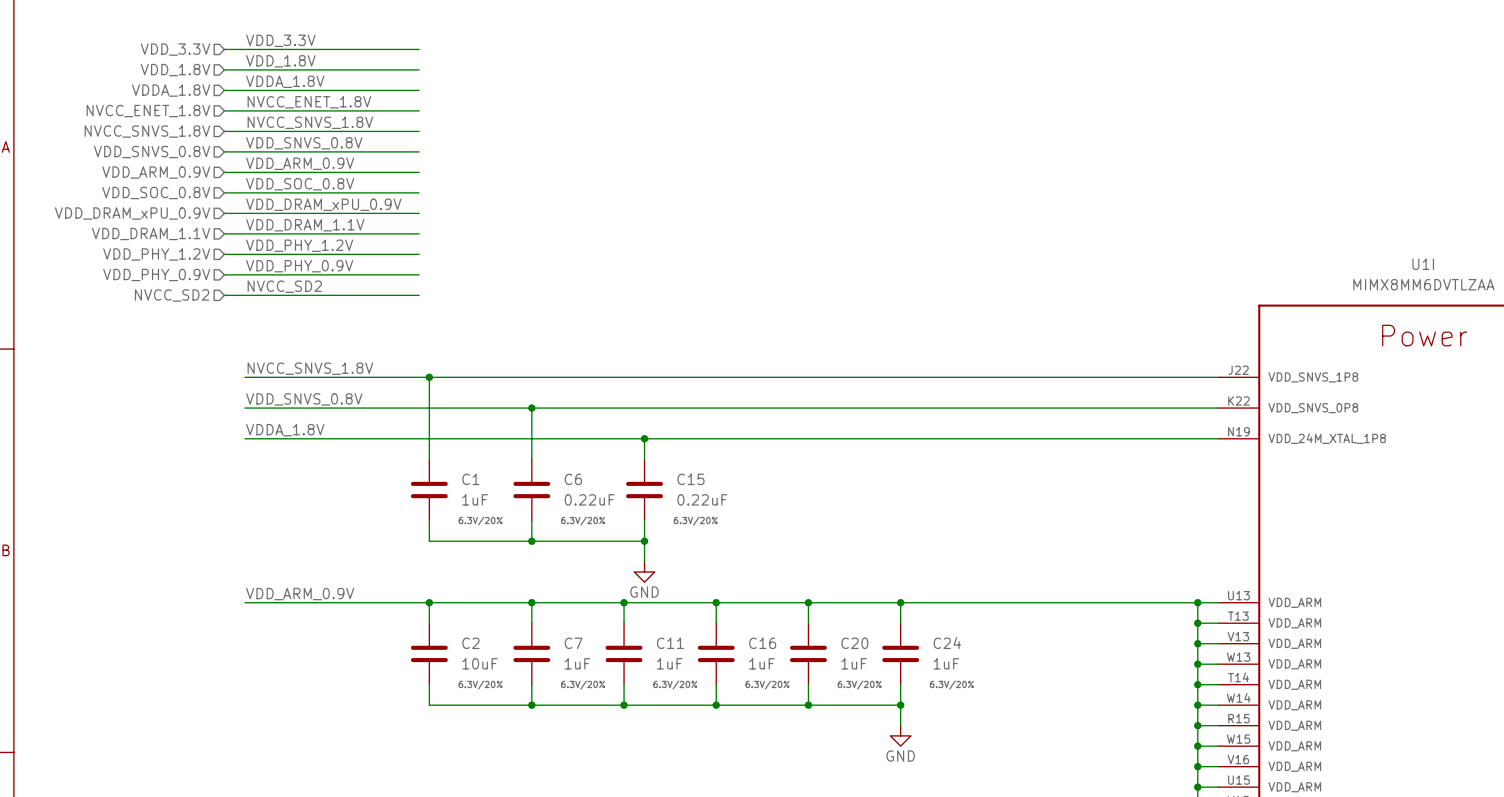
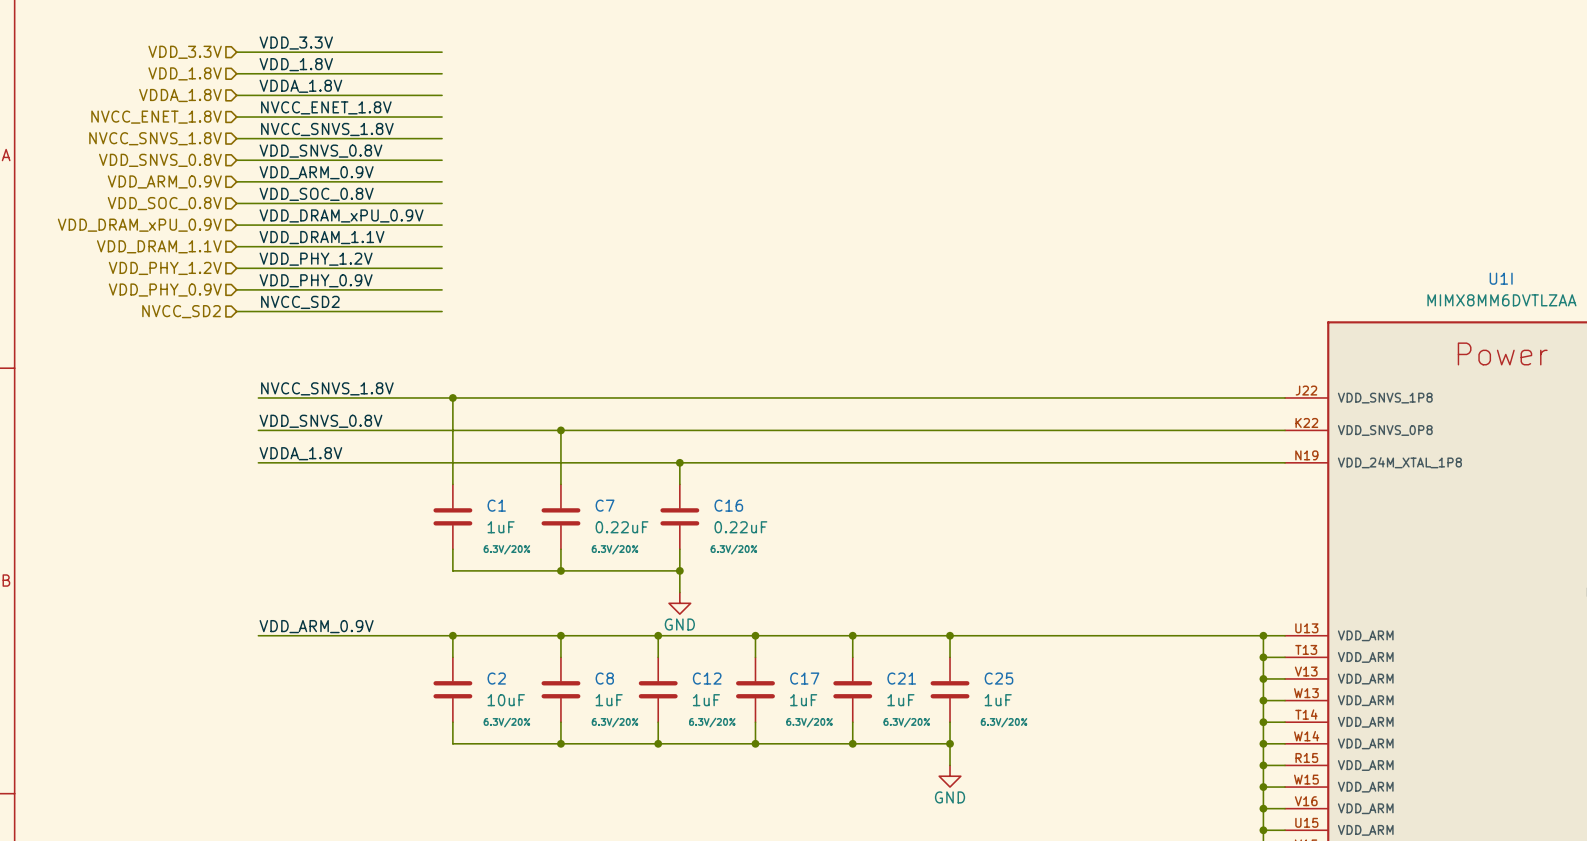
C6 name: C6 (573, 479) -> C7 (605, 505)
C15 name: C15 (690, 479) -> C16 (728, 505)
C7 name: C7 (573, 643) -> C8 (604, 678)
C11 name: C11 (670, 643) -> C12 (707, 678)
C16 name: C16 (762, 643) -> C17 (804, 678)
C20 name: C20 (854, 643) -> C21 (901, 678)
C24 name: C24 (947, 643) -> C25 (998, 678)

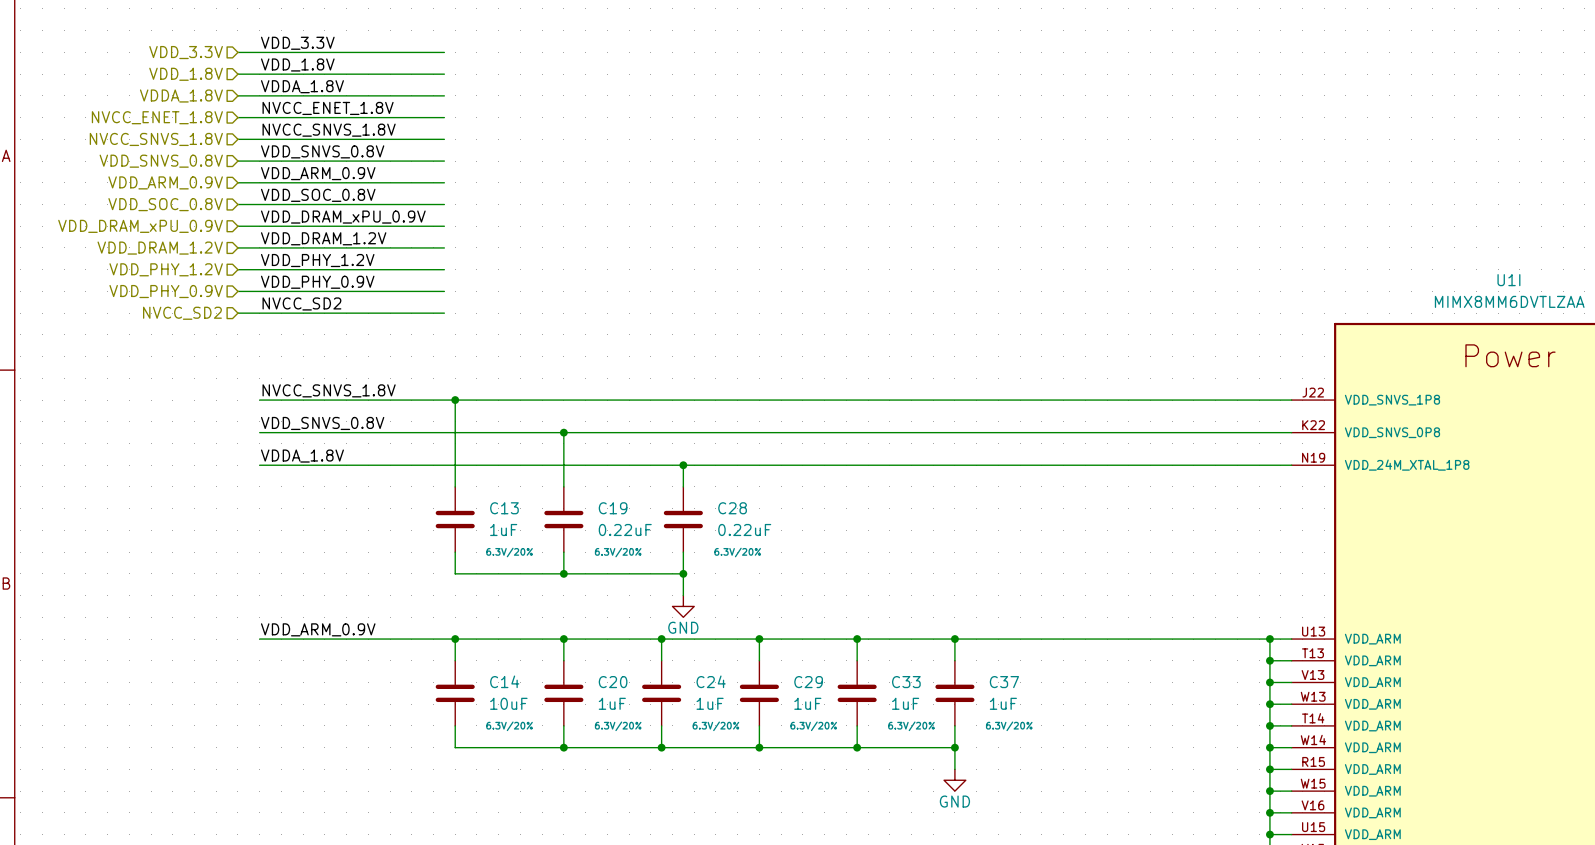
label: VDD_DRAM_1.1V (322, 237) -> VDD_DRAM_1.2V (323, 238)
hierarchical label: VDD_DRAM_1.1V (159, 246) -> VDD_DRAM_1.2V (160, 248)
C1 name: C1 (496, 505) -> C13 (504, 508)
C7 name: C7 (605, 505) -> C19 (613, 508)
C16 name: C16 (728, 505) -> C28 (732, 508)
C2 name: C2 (496, 678) -> C14 (504, 681)
C8 name: C8 (604, 678) -> C20 (613, 682)
C12 name: C12 (707, 678) -> C24 (711, 681)
C17 name: C17 (804, 678) -> C29 (808, 682)
C21 name: C21 (901, 678) -> C33 (906, 682)
C25 name: C25 (998, 678) -> C37 (1004, 682)

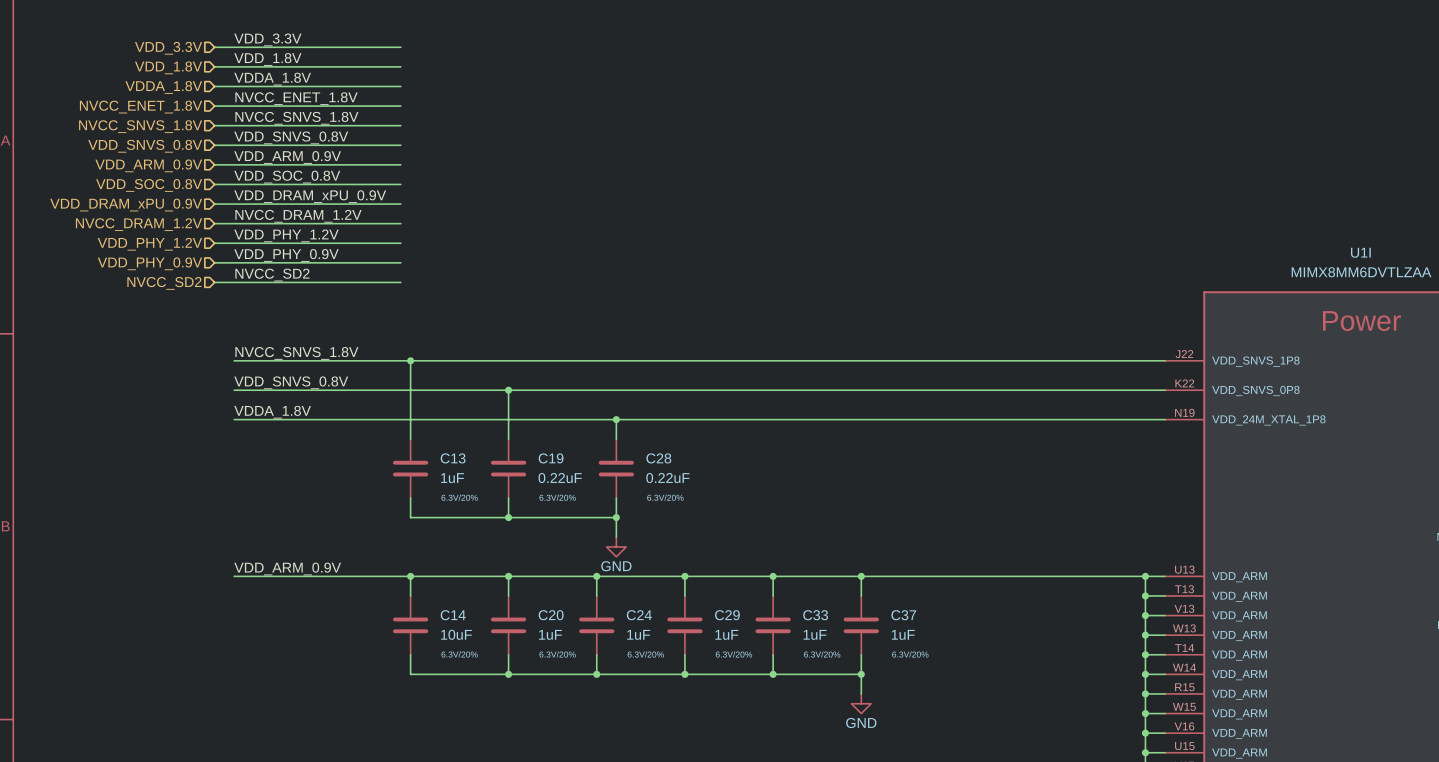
label: VDD_DRAM_1.2V (323, 238) -> NVCC_DRAM_1.2V (298, 216)
hierarchical label: VDD_DRAM_1.2V (160, 248) -> NVCC_DRAM_1.2V (139, 224)

